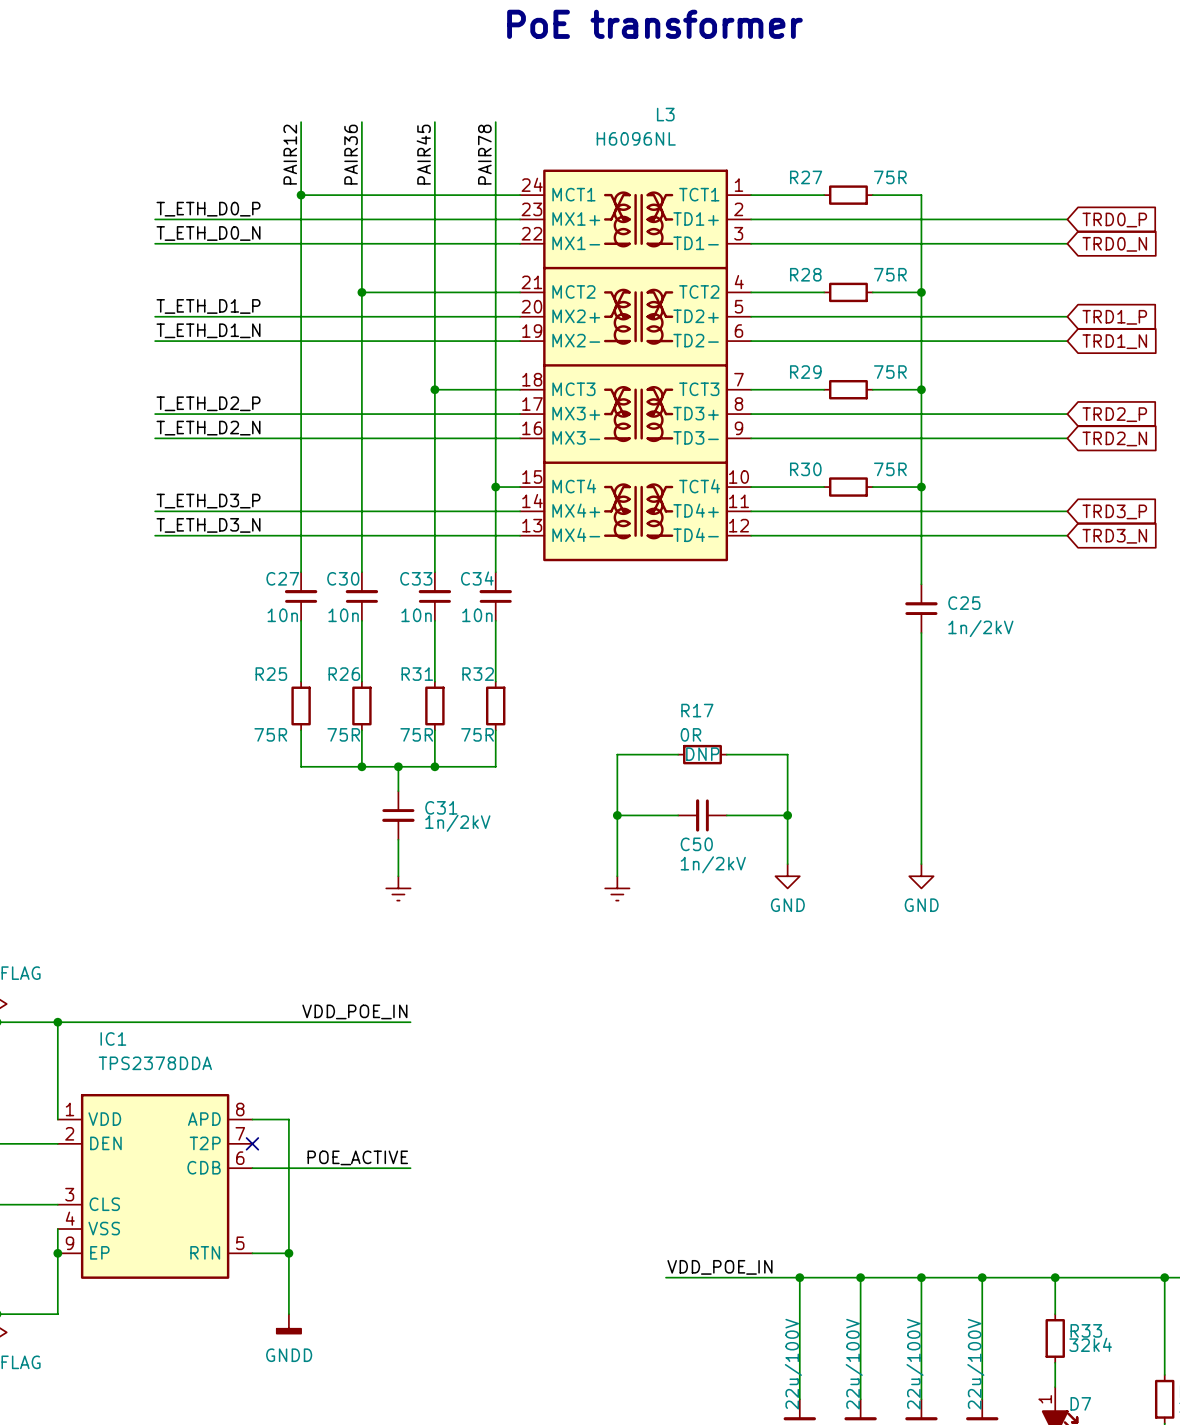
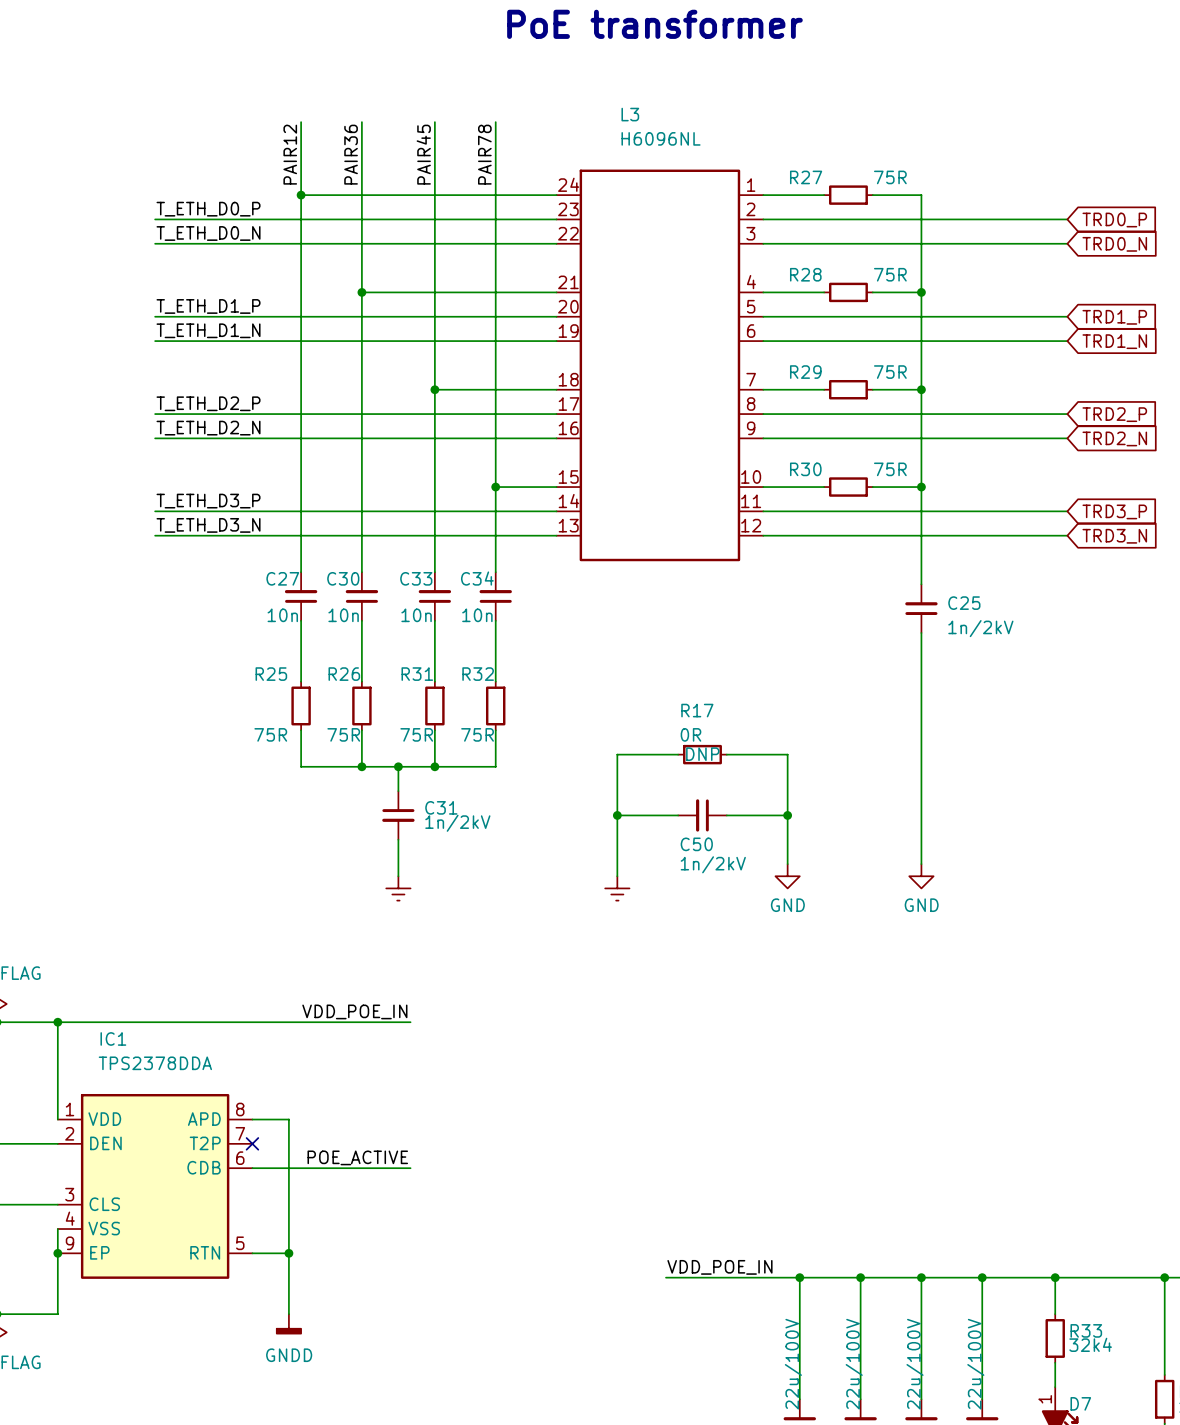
L3 name position: L3 (665, 114) -> L3 (630, 114)
L3 text: H6096NL (636, 138) -> none
L3 value: none -> H6096NL (661, 138)
L3 symbol: [520, 169, 752, 562] -> [556, 169, 764, 562]

